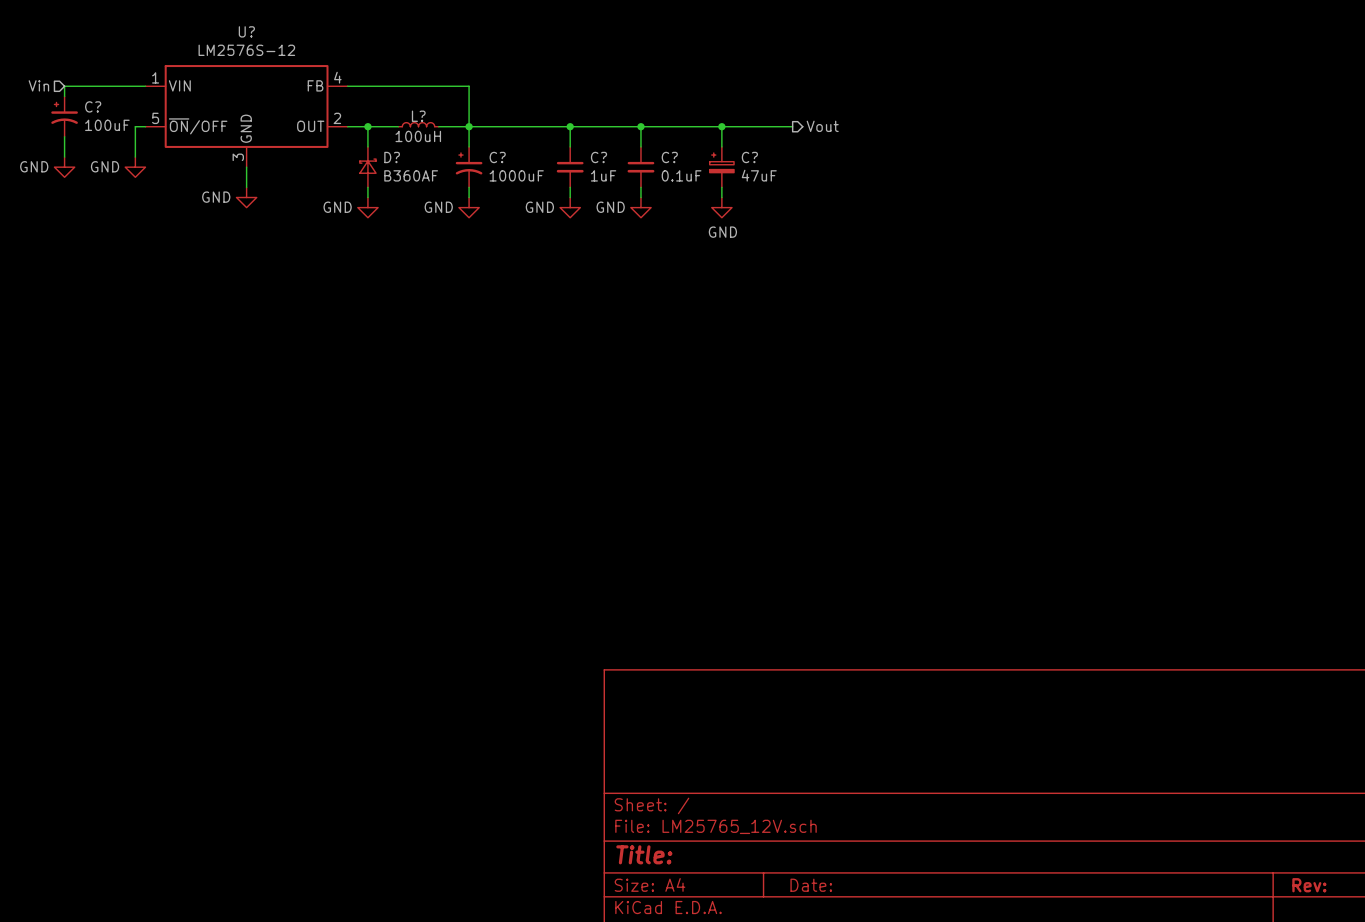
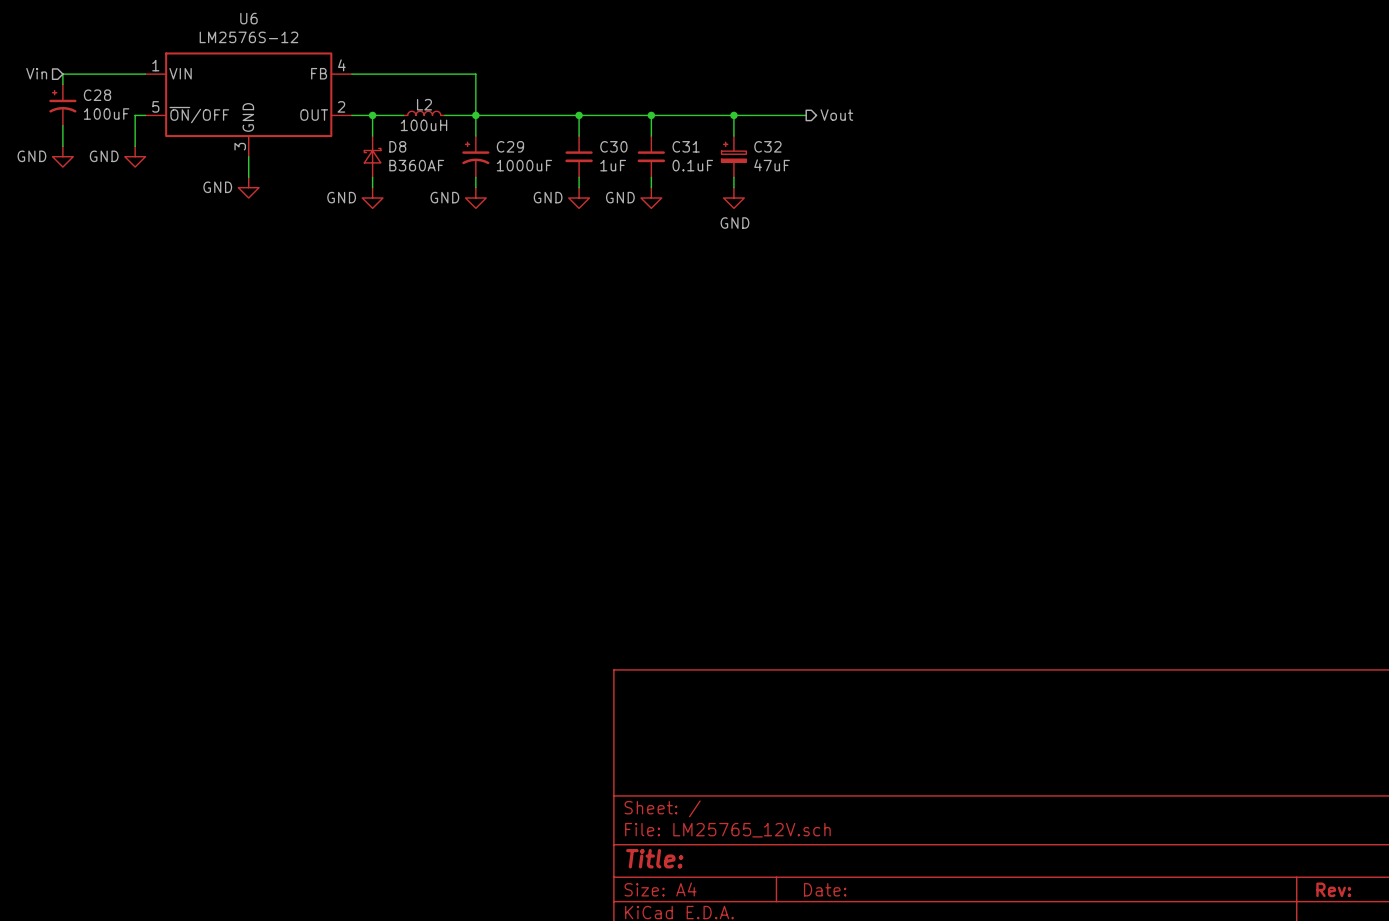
U? name: U? (246, 31) -> U6 (248, 18)
C? name: C? (93, 106) -> C28 (97, 95)
L? name: L? (418, 116) -> L2 (424, 104)
D? name: D? (392, 157) -> D8 (397, 146)
C? name: C? (497, 157) -> C29 (510, 146)
C? name: C? (598, 157) -> C30 (613, 146)
C? name: C? (669, 157) -> C31 (686, 146)
C? name: C? (749, 157) -> C32 (767, 146)

